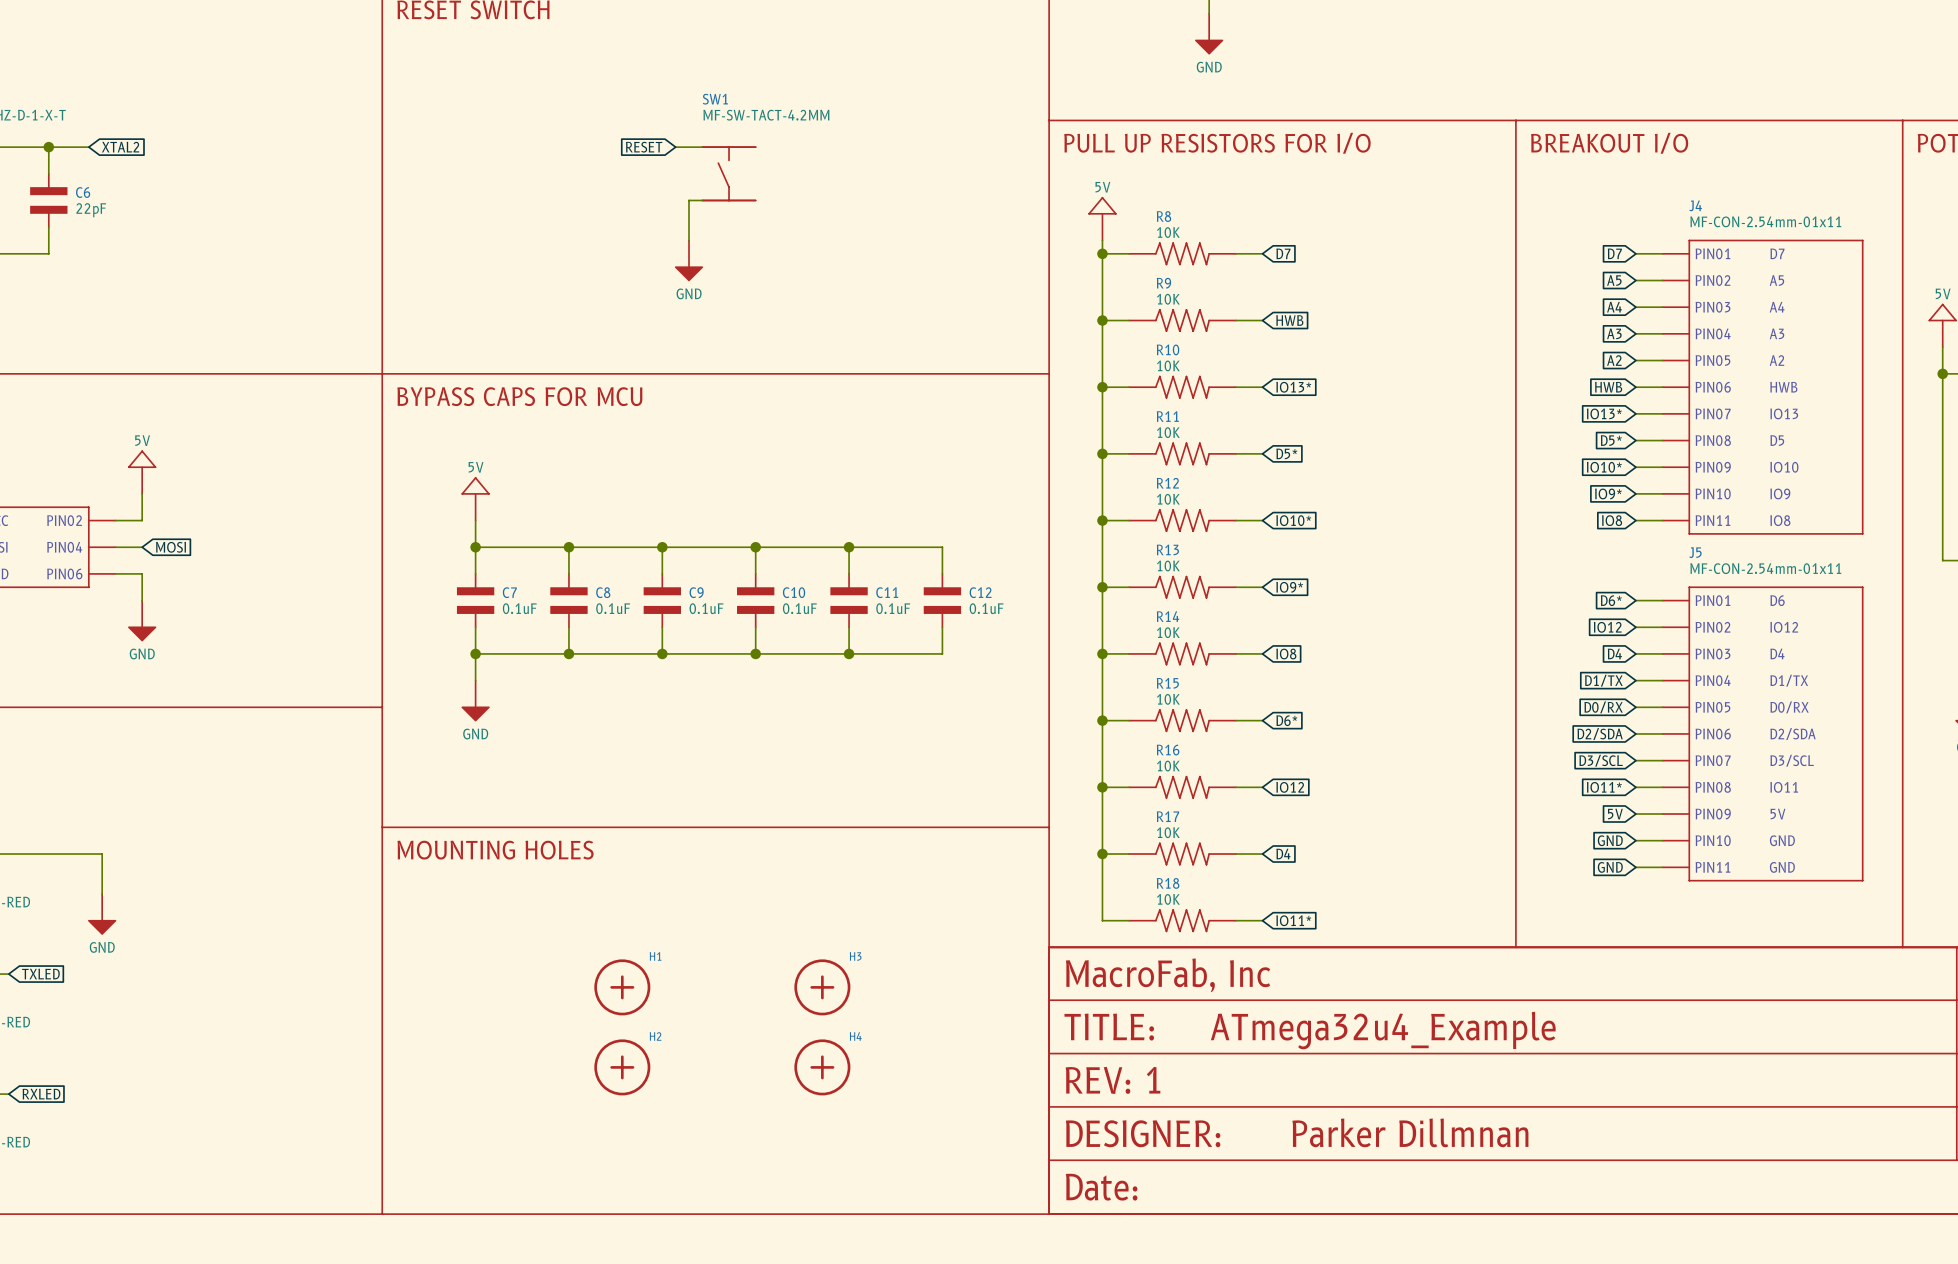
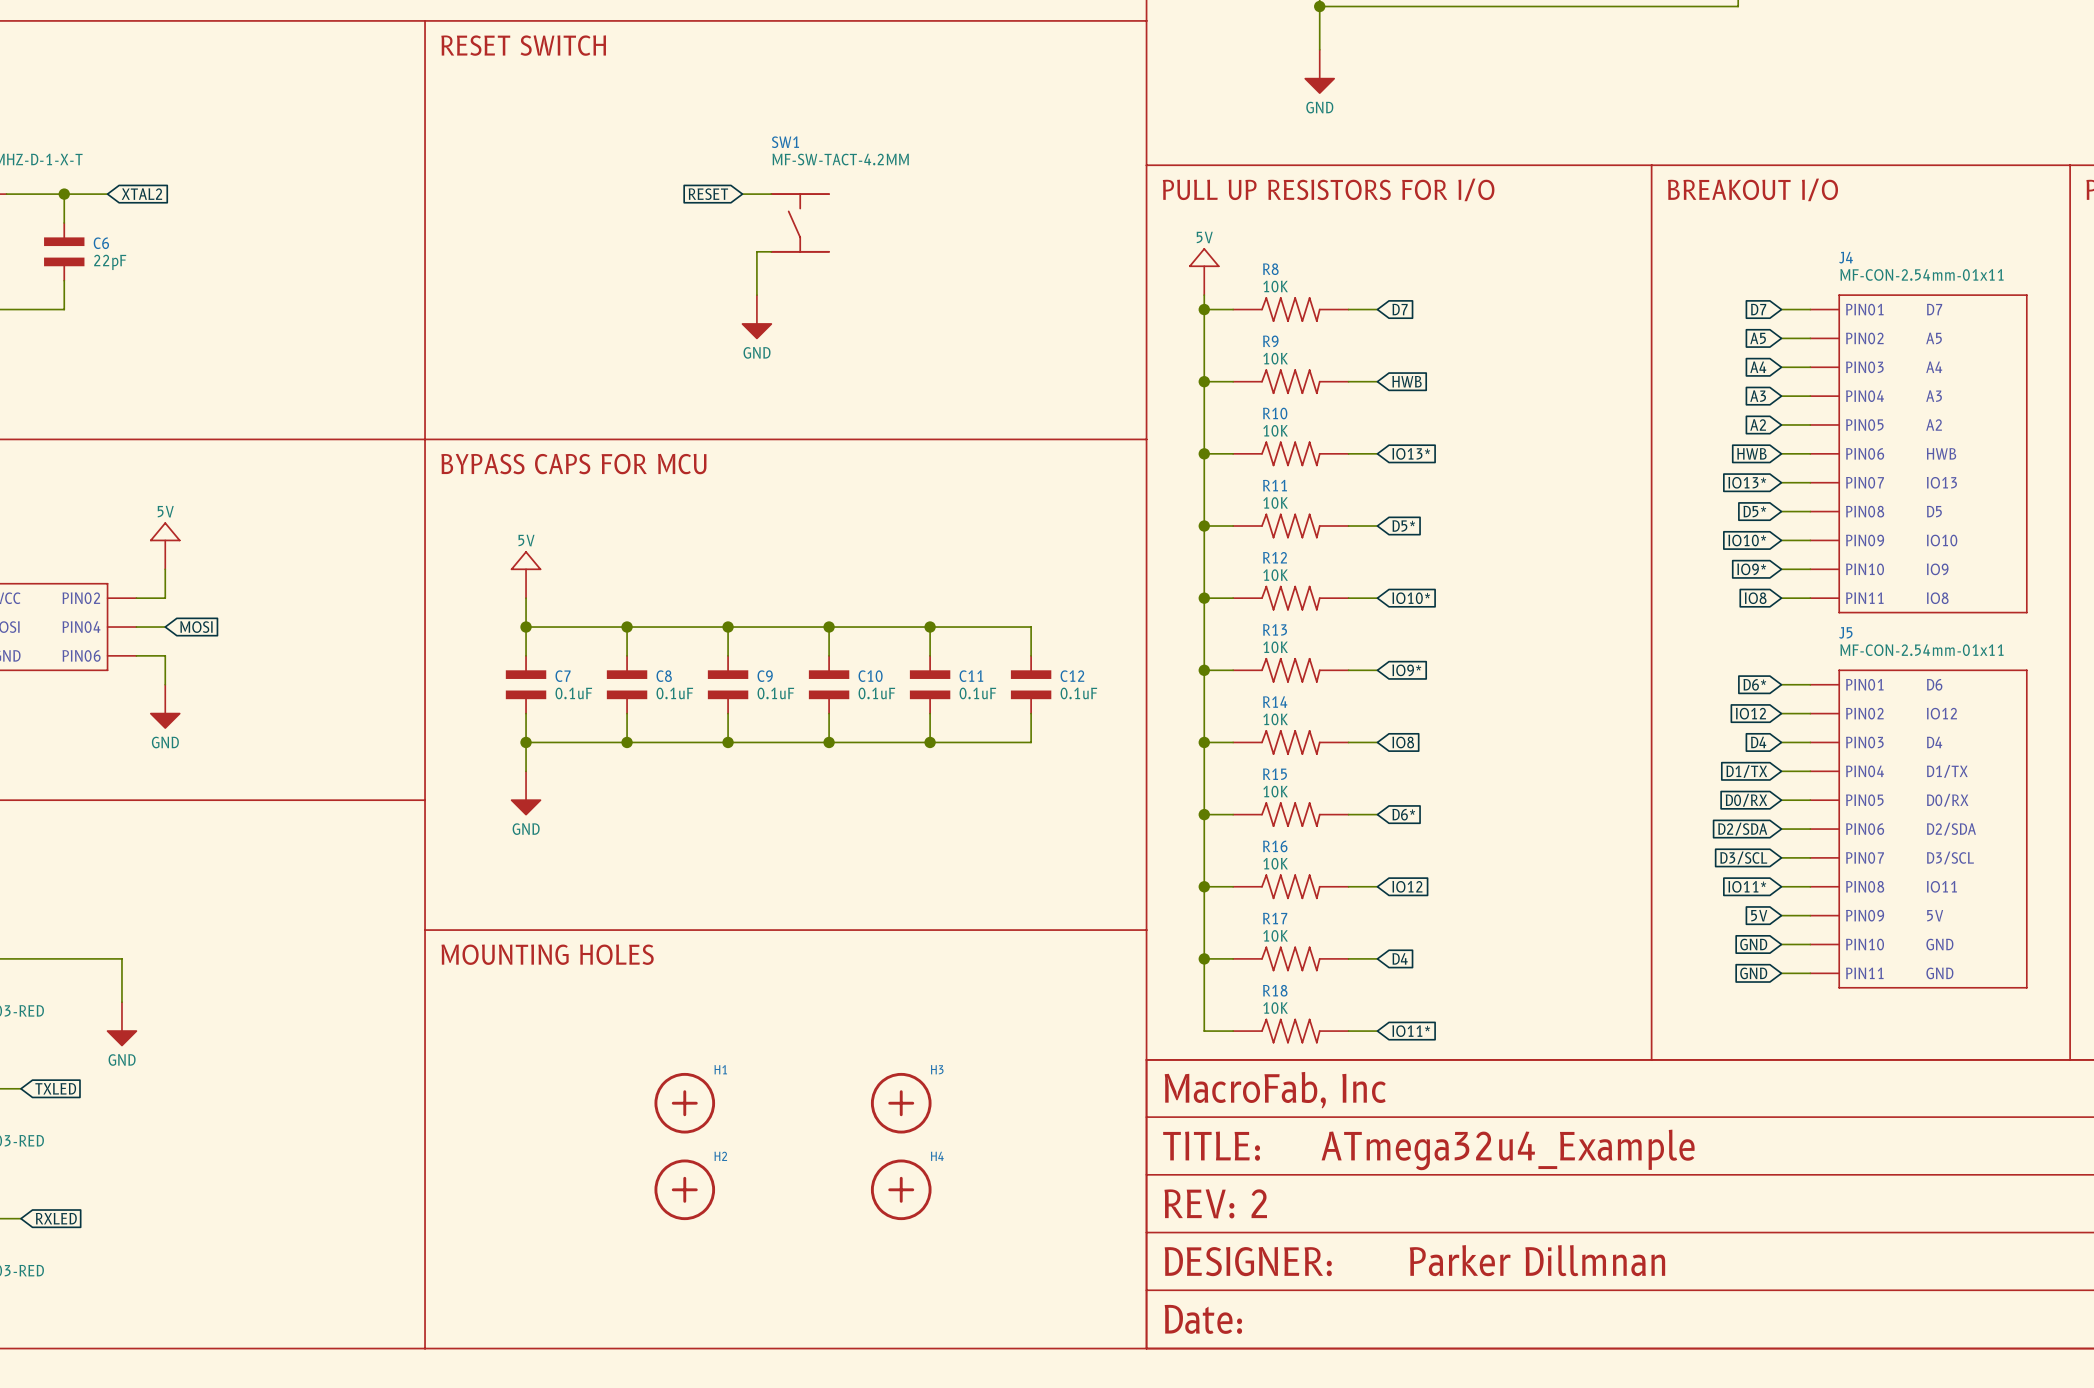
part text: REV: 1 (1112, 1080) -> REV: 2 (1215, 1203)

